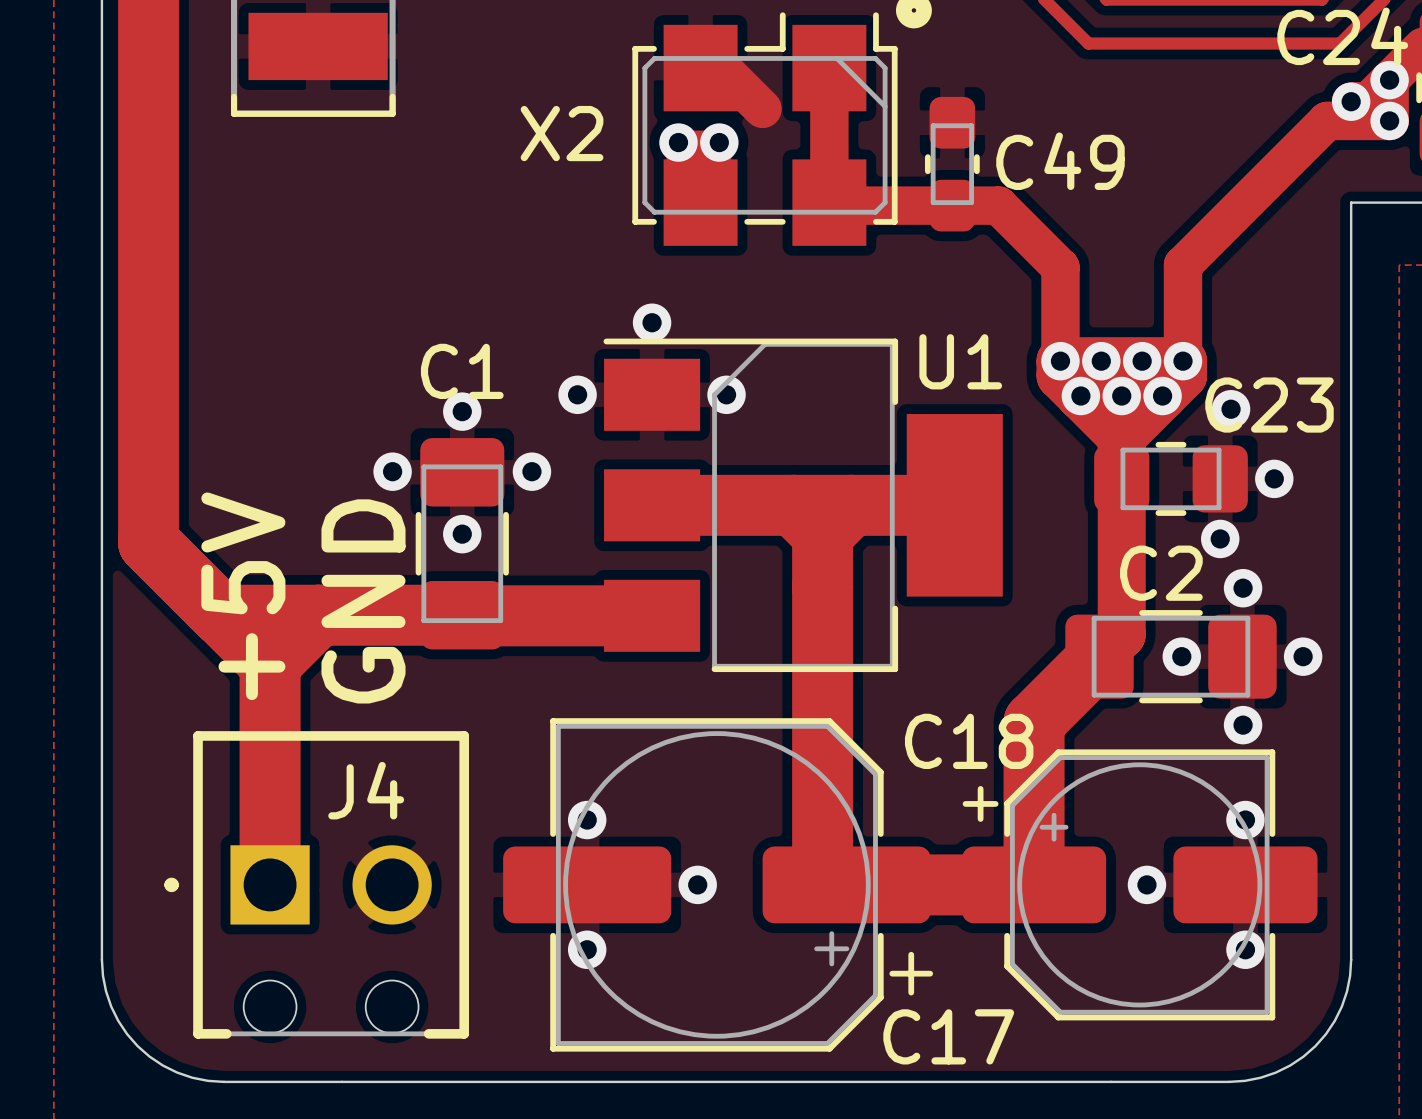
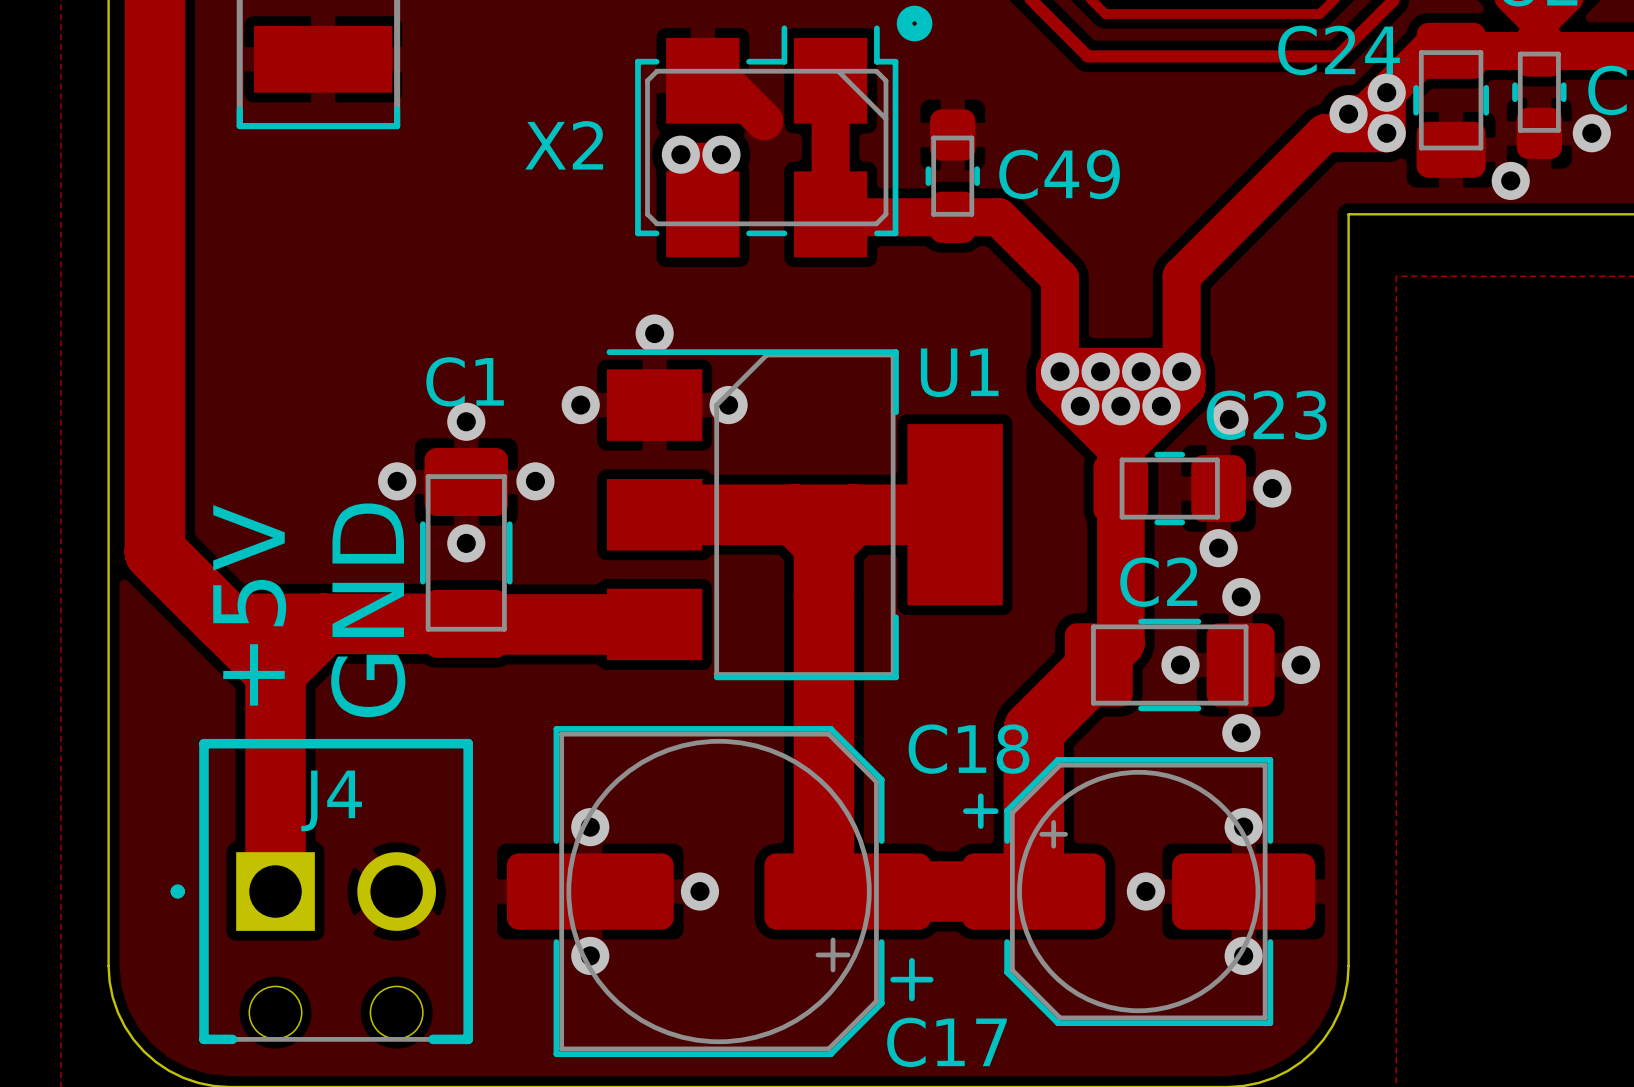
J4 name position: J4 (366, 790) -> J4 (331, 800)

